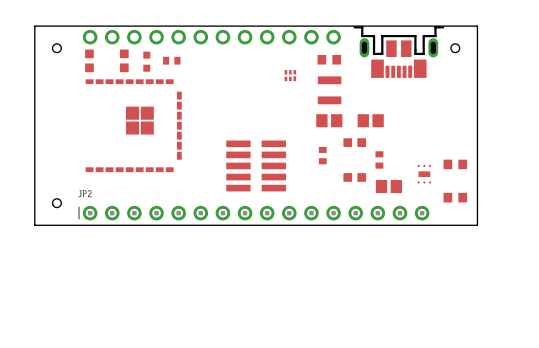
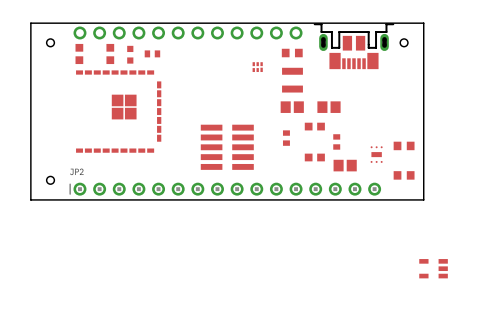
part: none -> (433, 268)

